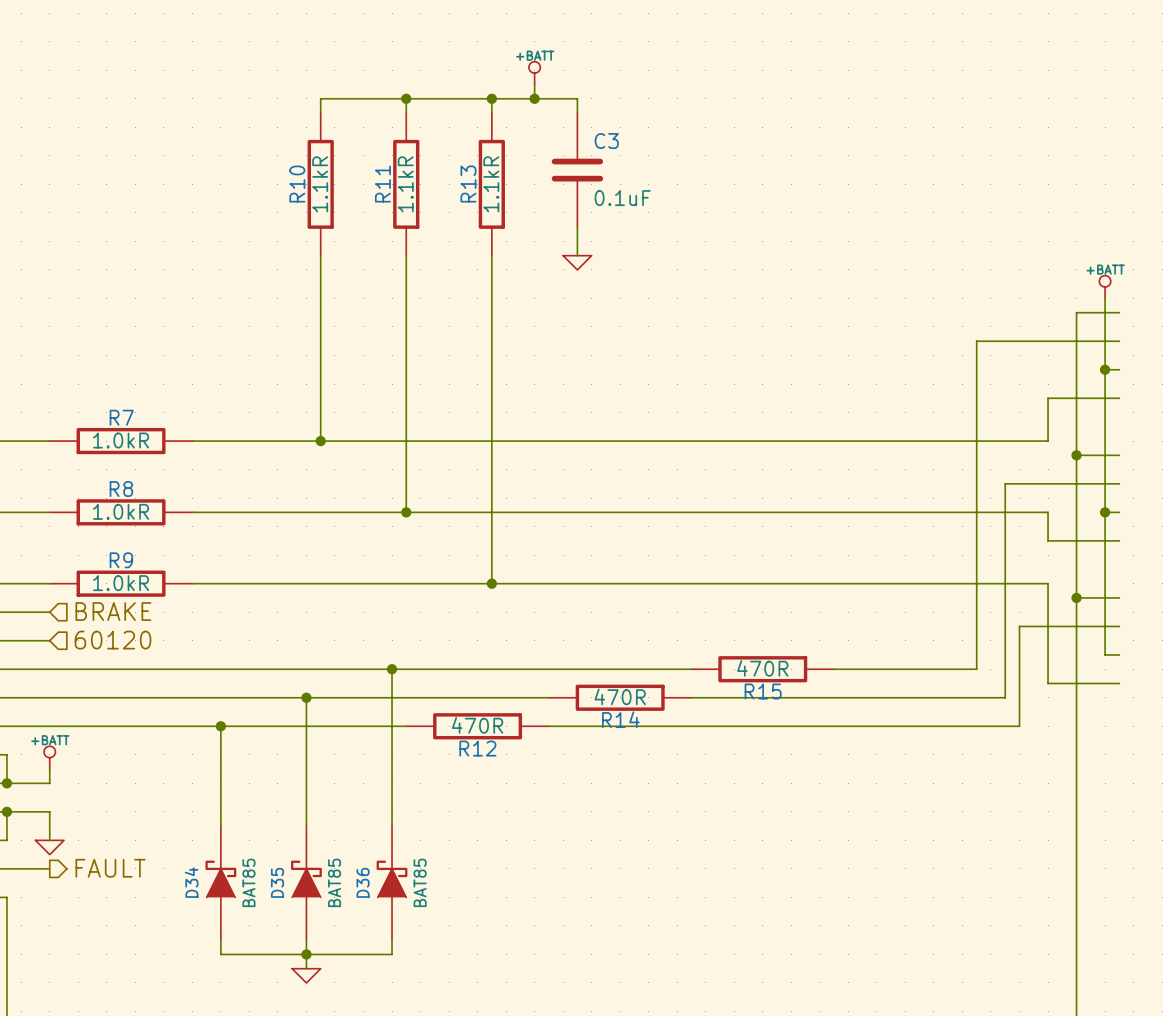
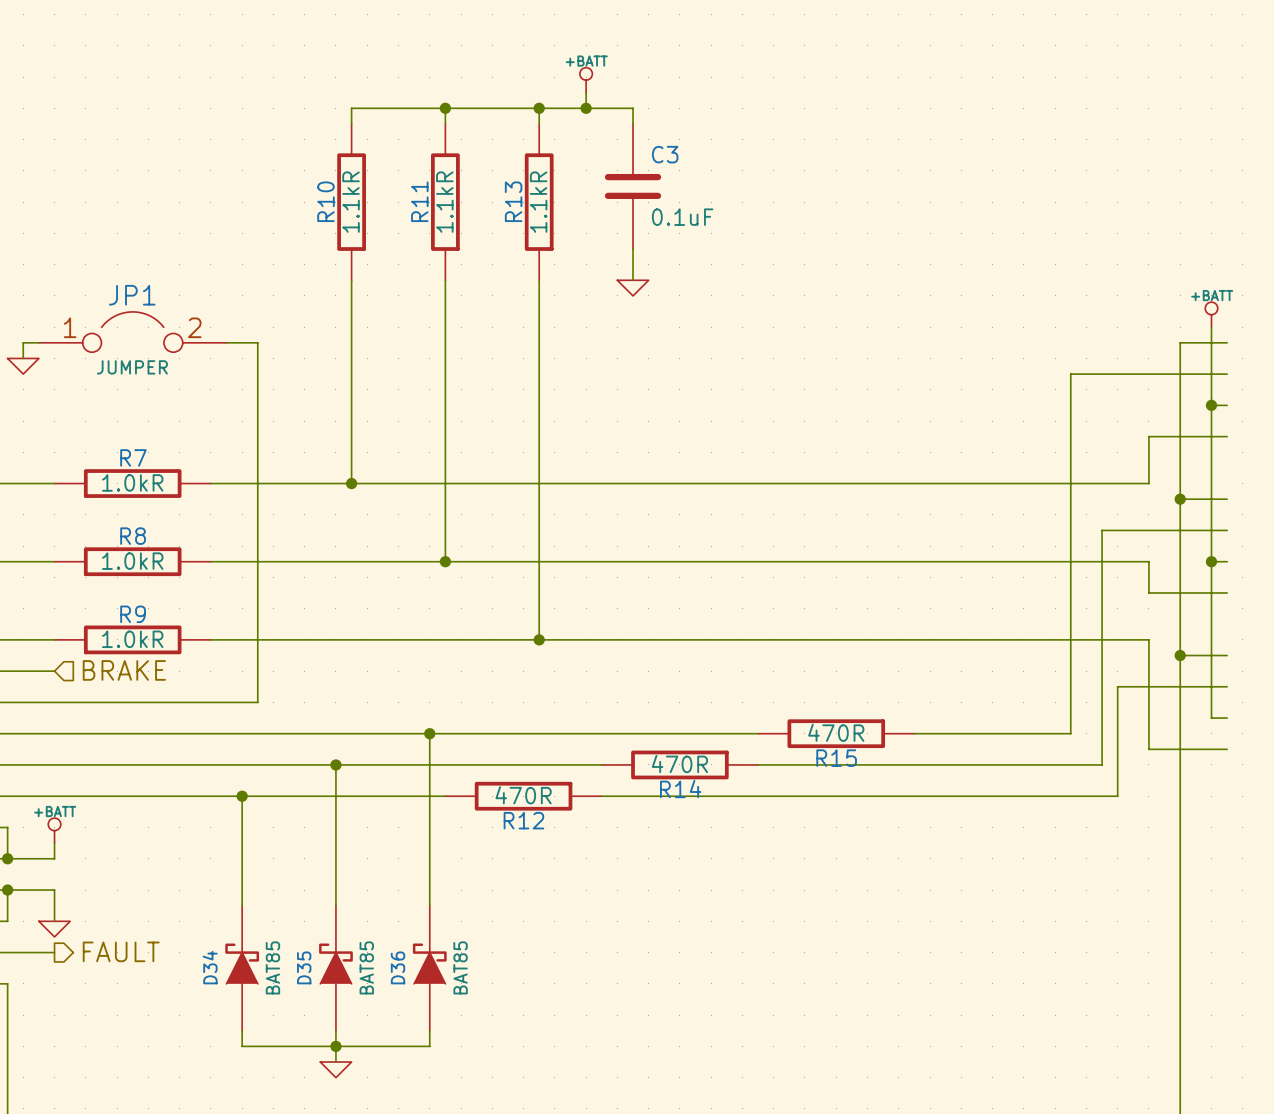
JP1: none -> JUMPER (132, 332)
wire: none -> (38, 342) (23, 342) (23, 358)
wire: none -> (226, 342) (257, 342) (257, 702) (54, 702)
power symbol: none -> (23, 366)
hierarchical label: 60120 (113, 640) -> none

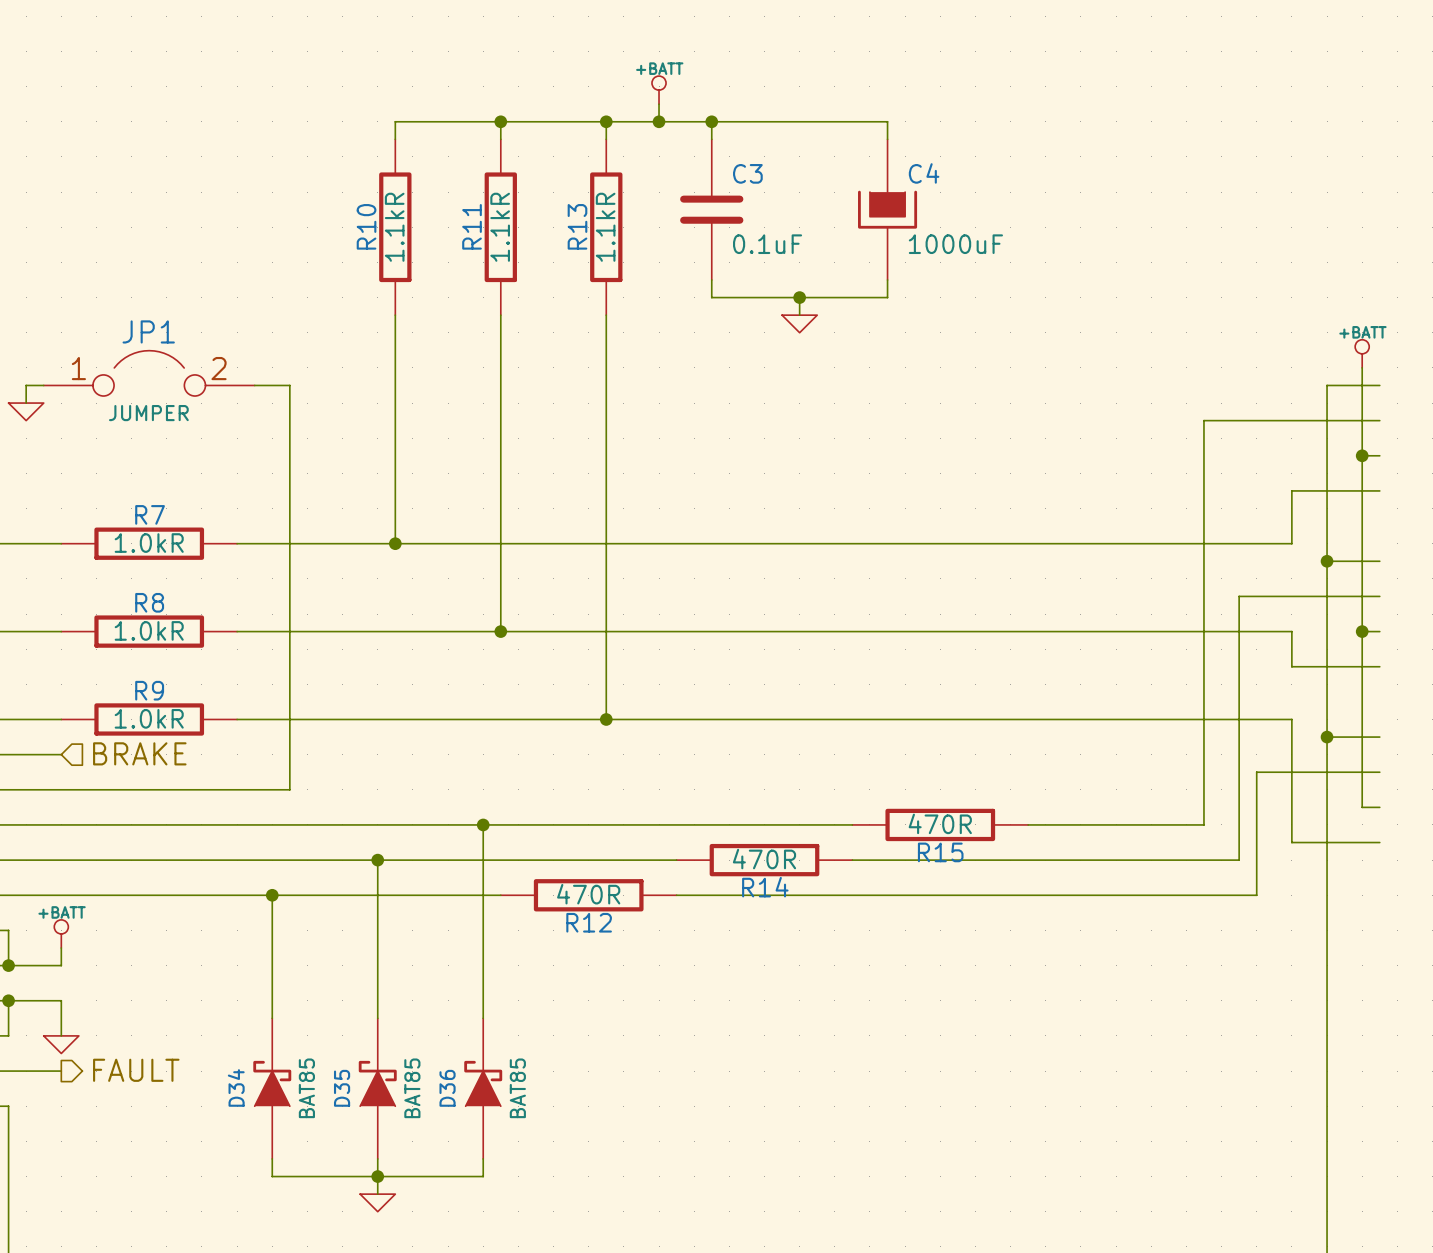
wire: none -> (711, 121) (887, 121) (887, 139)
junction: none -> (711, 121)
C4: none -> 1000uF (887, 209)
wire: (633, 264) (633, 280) -> (711, 297) (887, 297) (887, 279)
wire: none -> (799, 297) (799, 315)
junction: none -> (799, 297)
power symbol position: (633, 288) -> (799, 323)

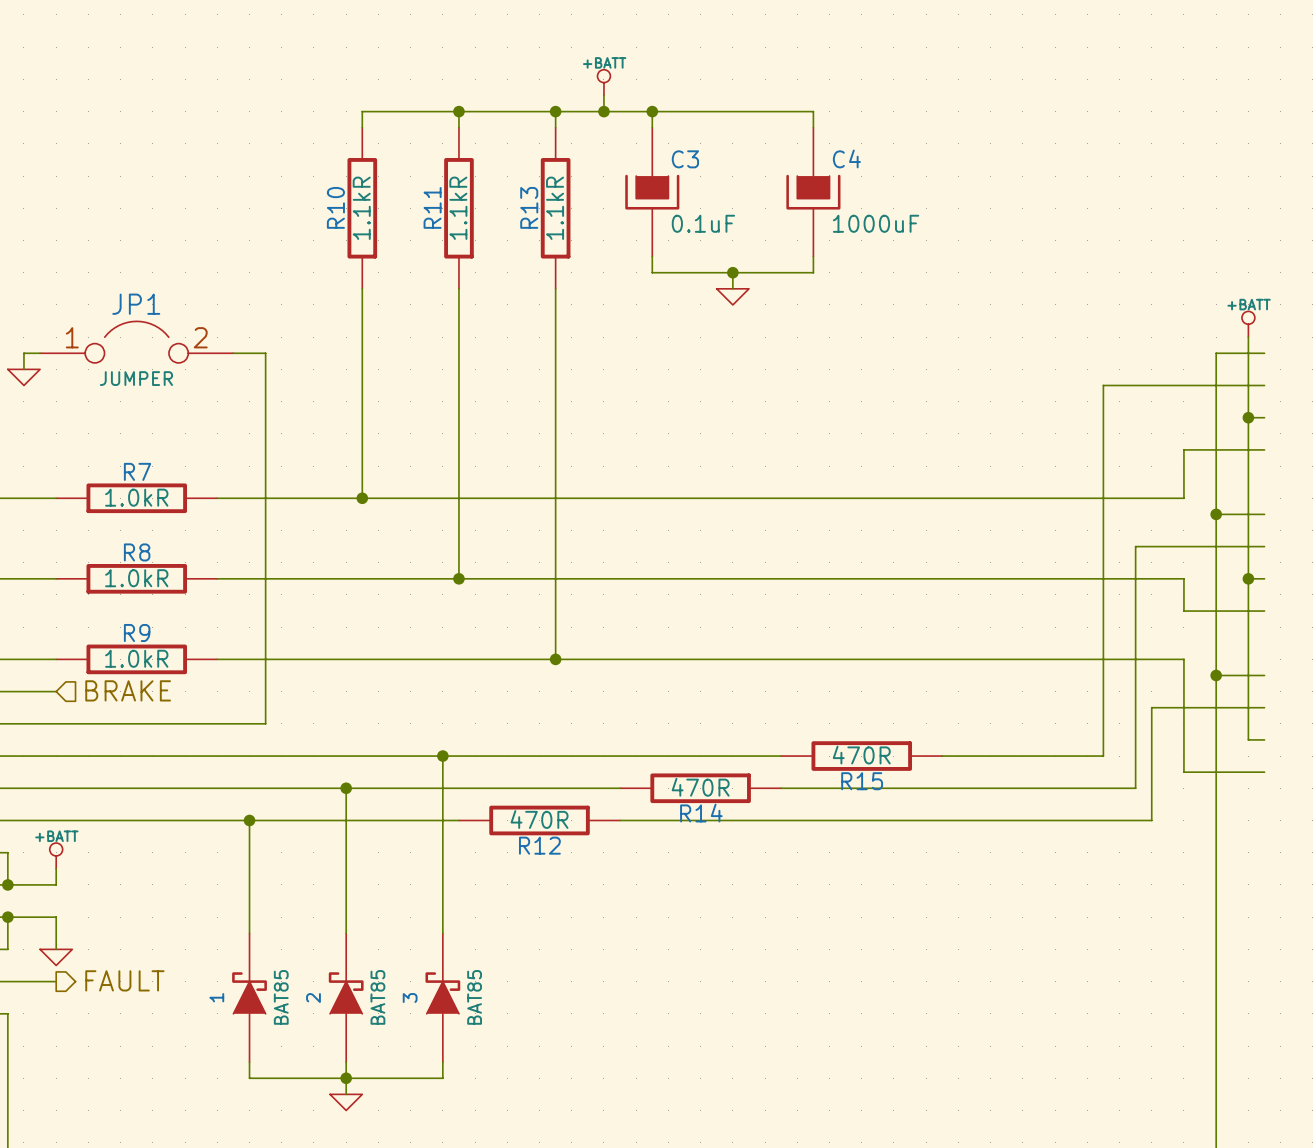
C3 symbol: [680, 139, 744, 280] -> [625, 127, 680, 257]
D34 name: D34 (236, 1087) -> 1 (216, 997)
D35 name: D35 (342, 1088) -> 2 (313, 998)
D36 name: D36 (447, 1088) -> 3 (410, 998)

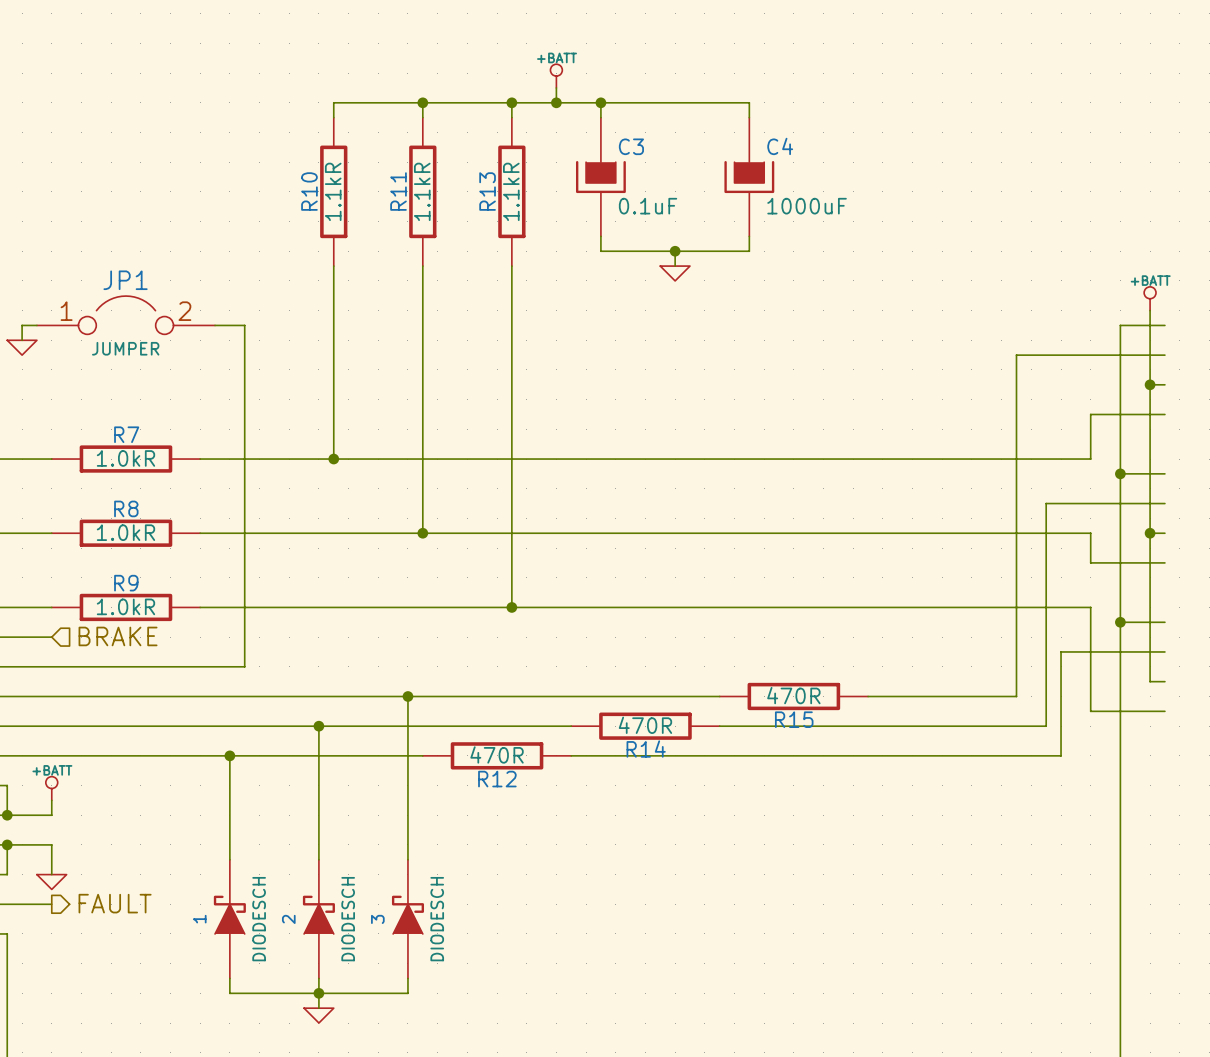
1 value: BAT85 (281, 997) -> DIODESCH (259, 919)
2 value: BAT85 (377, 997) -> DIODESCH (348, 919)
3 value: BAT85 (474, 997) -> DIODESCH (437, 919)

